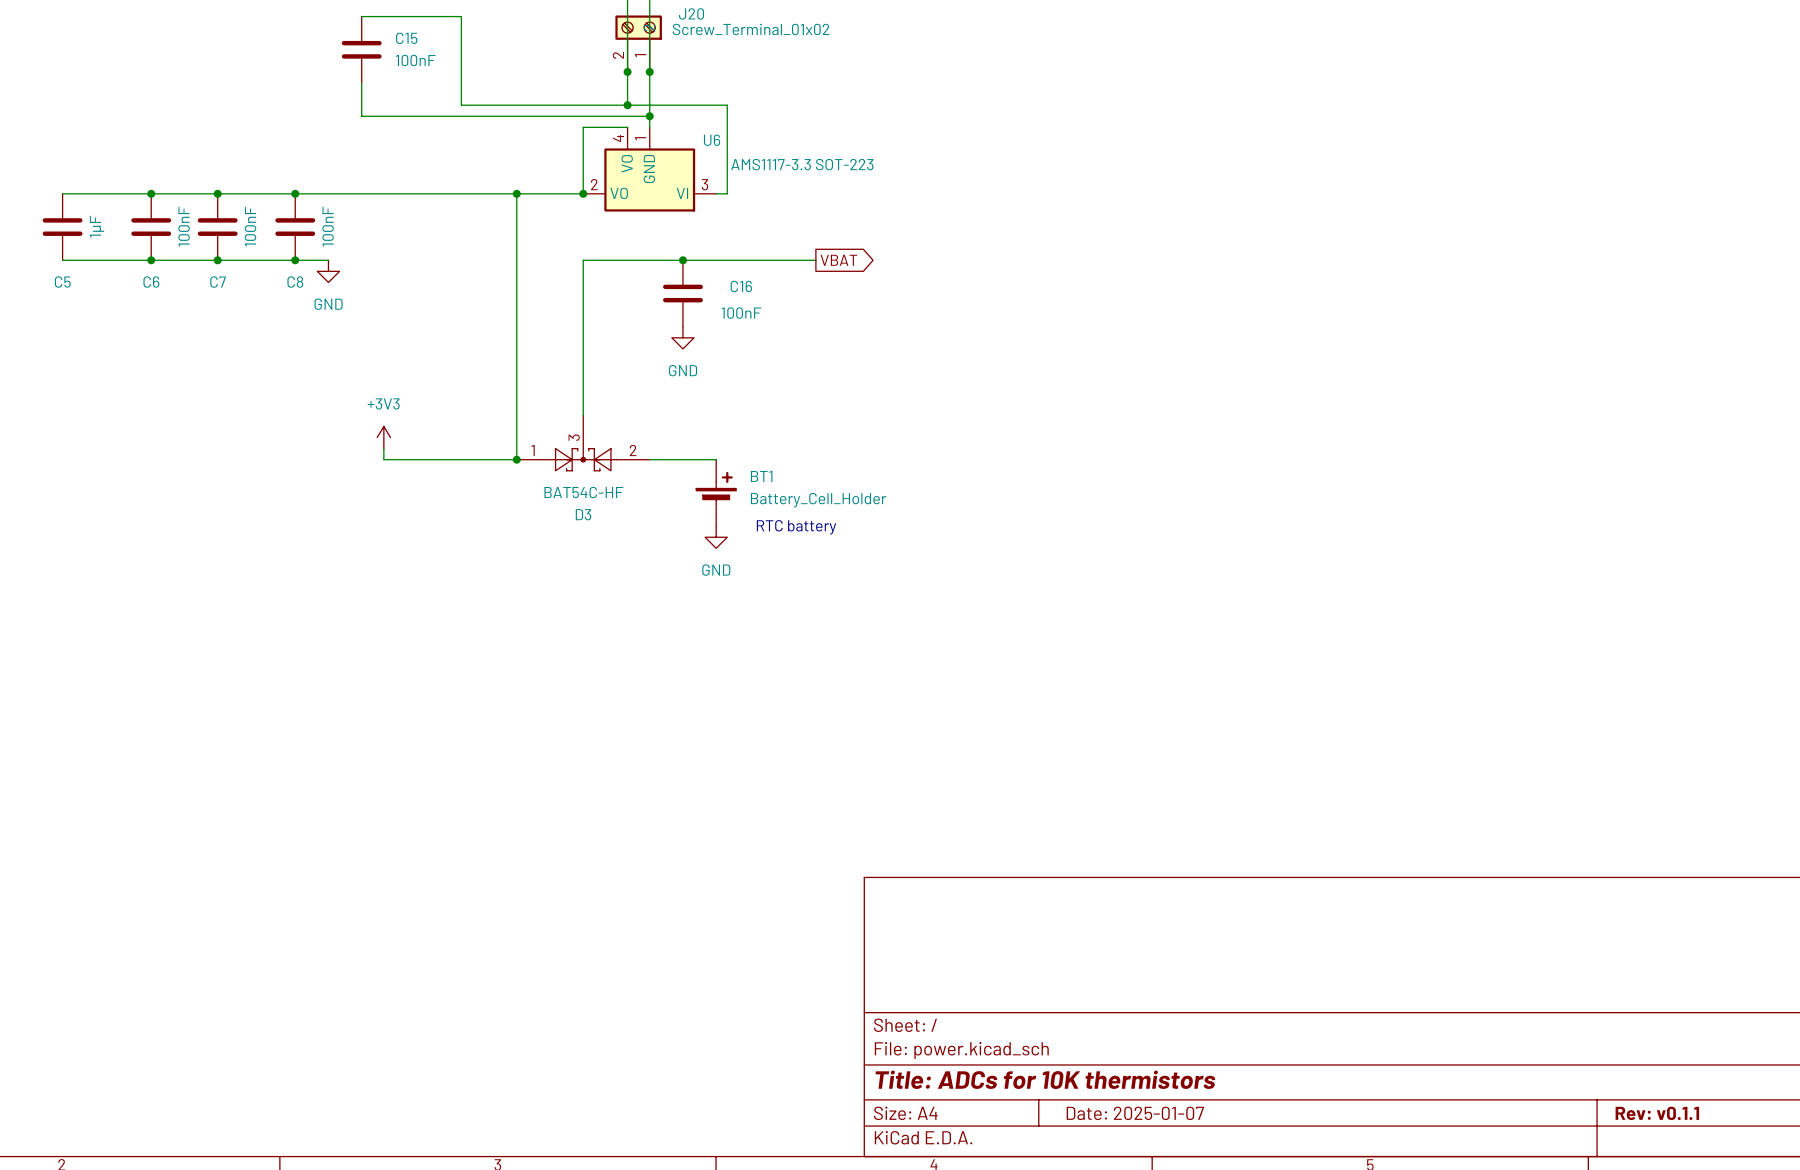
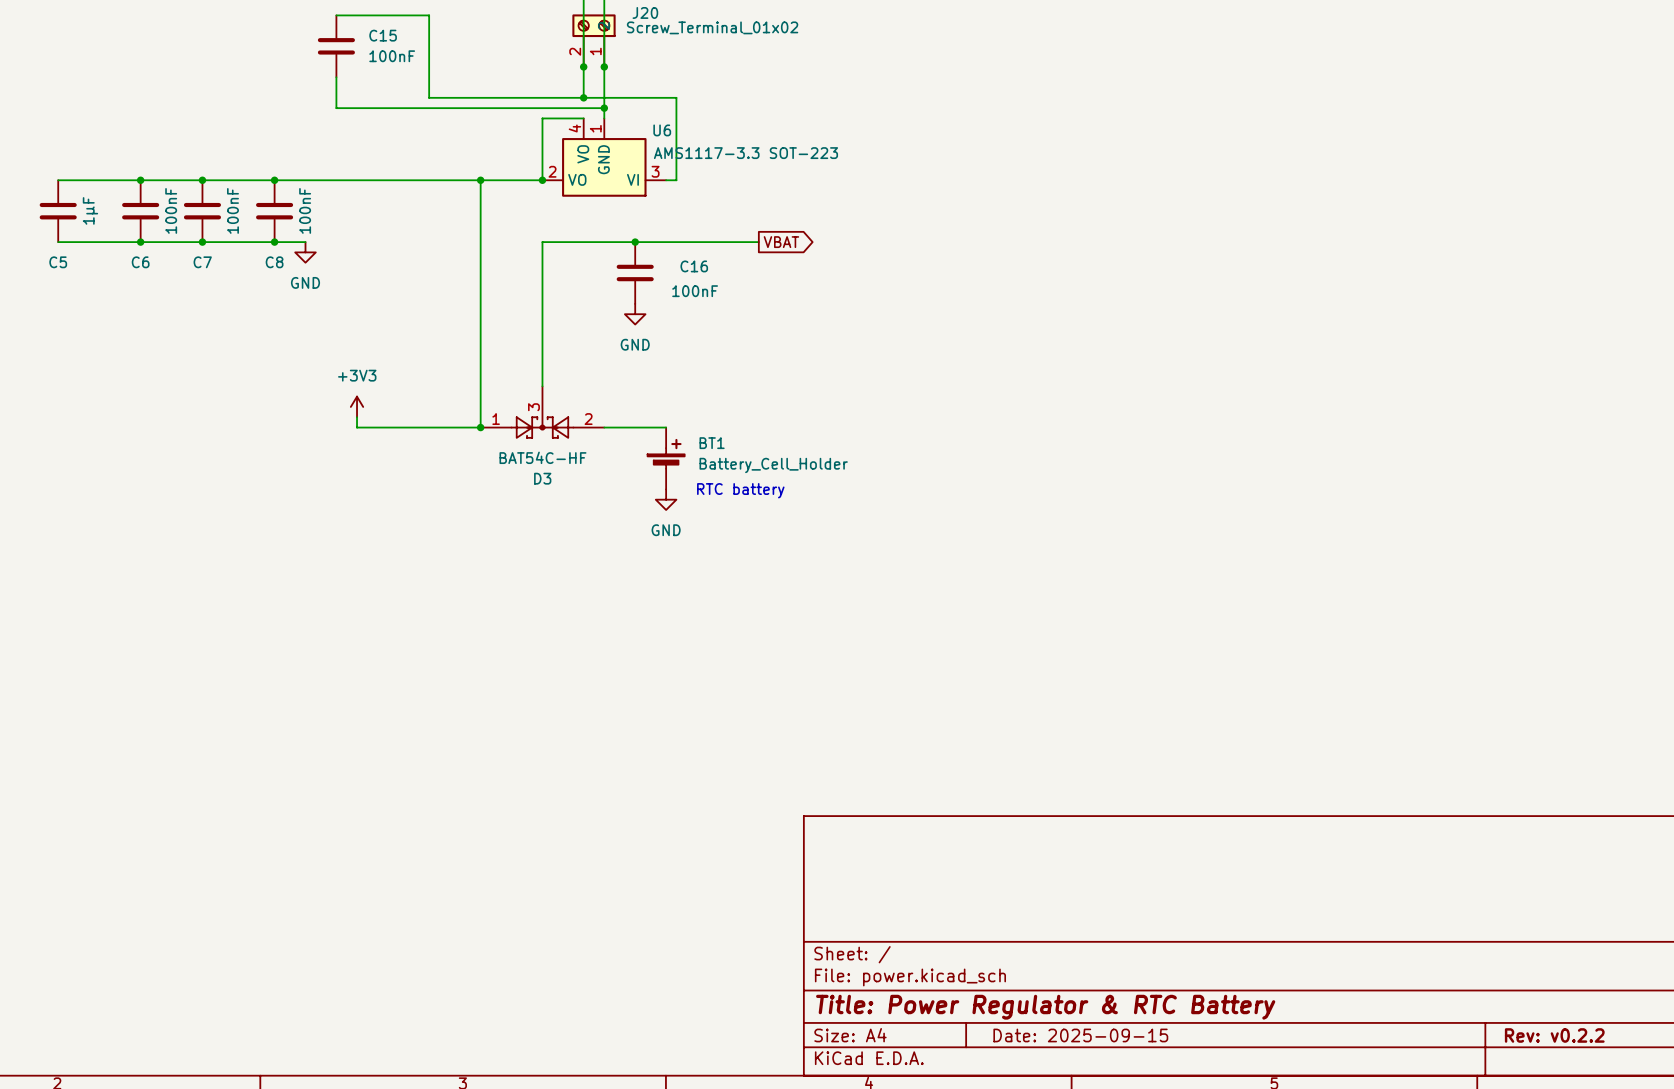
title block: Title: ADCs for 10K thermistors (1045, 1079) -> Title: Power Regulator & RTC Battery (1045, 1007)
title block: Date: 2025-01-07 (1135, 1113) -> Date: 2025-09-15 (1080, 1035)
title block: Rev: v0.1.1 (1657, 1113) -> Rev: v0.2.2 (1554, 1035)

